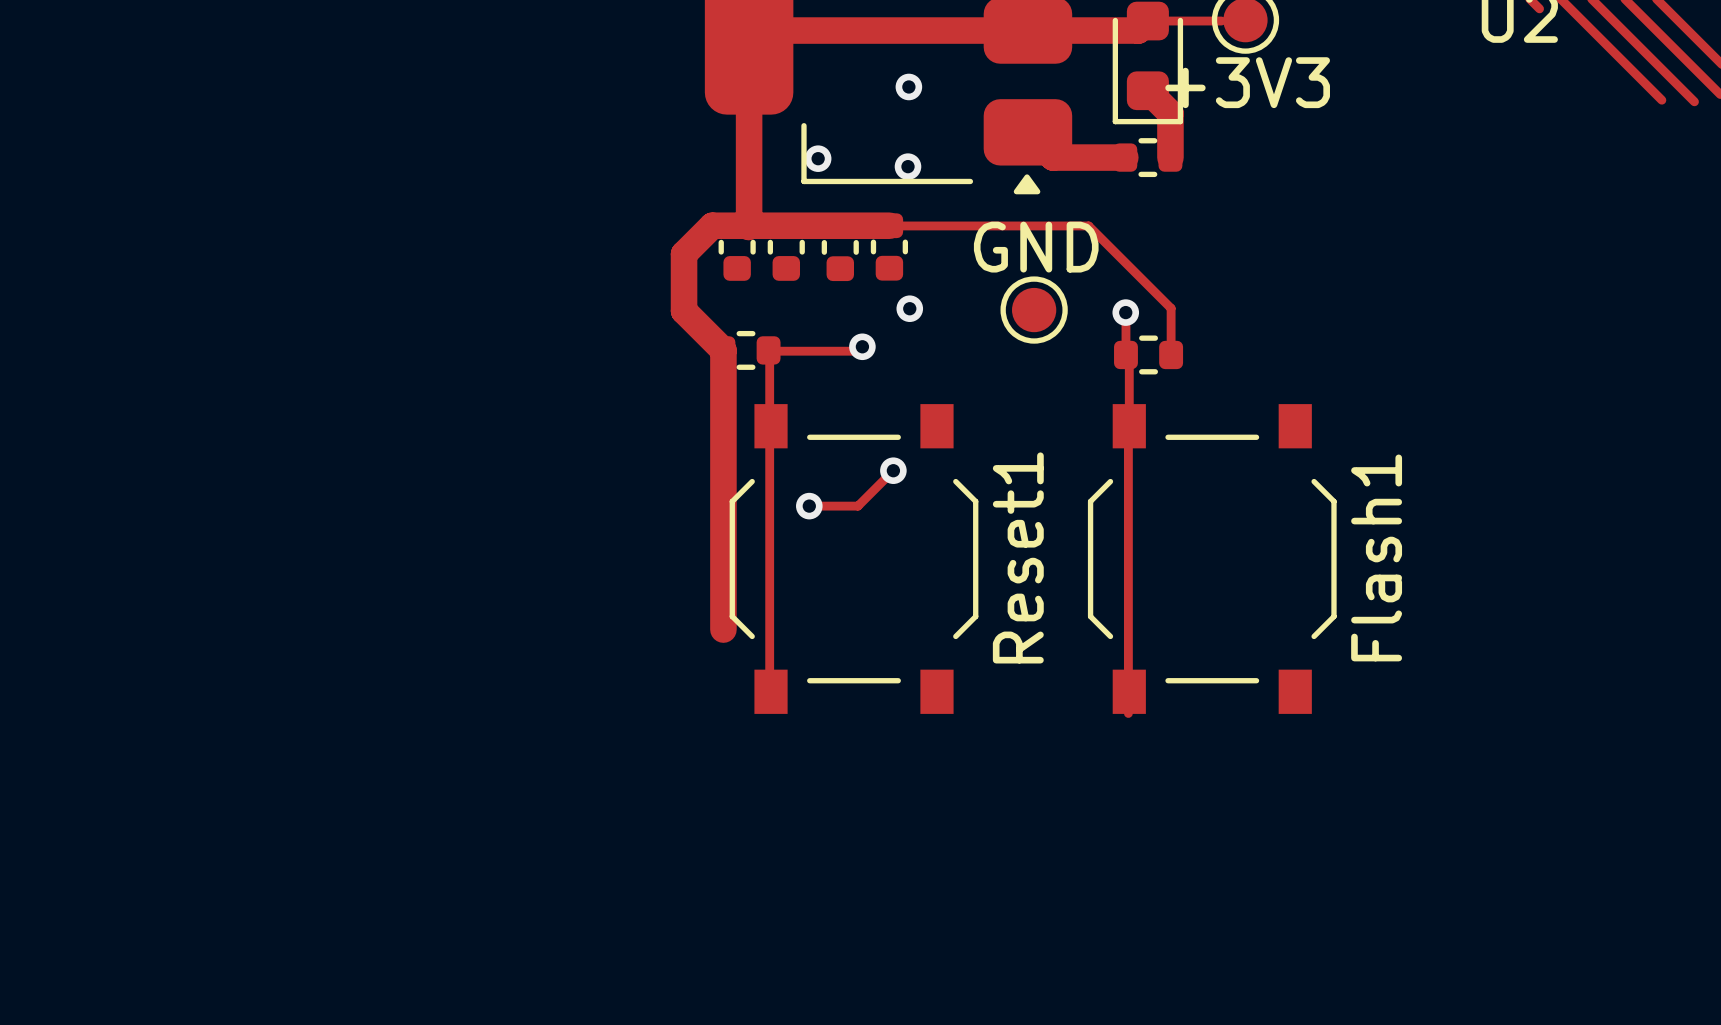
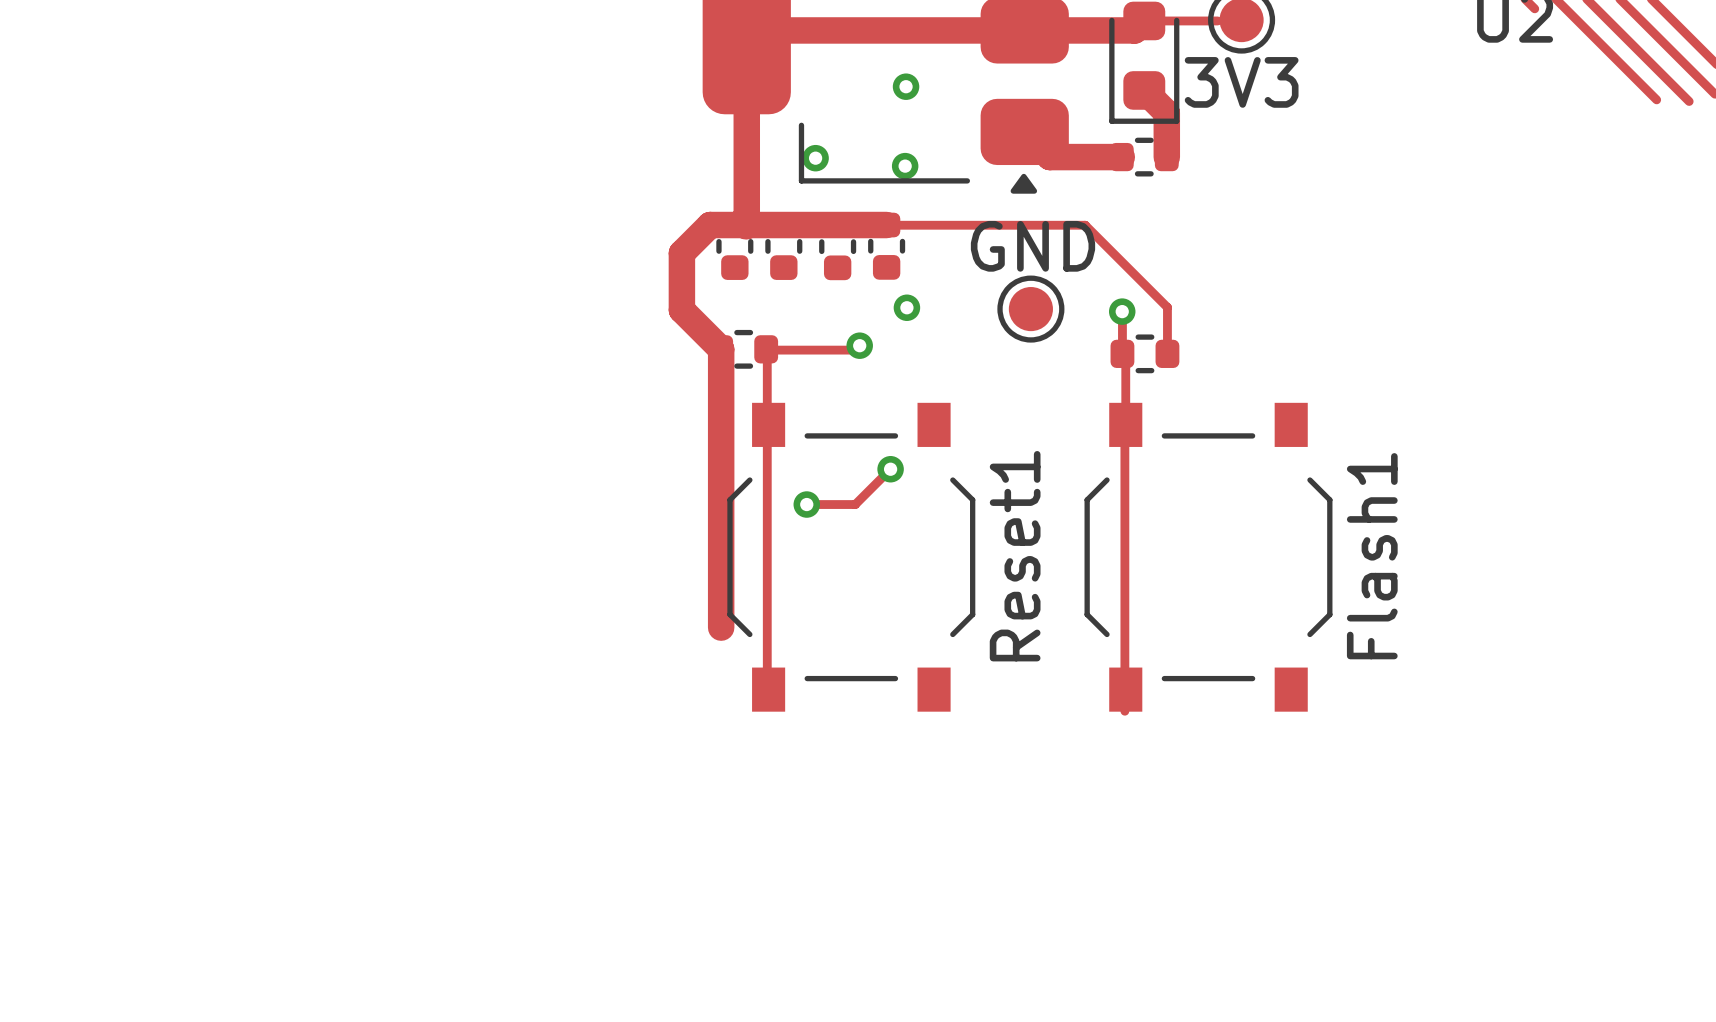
+3V3 name: +3V3 (1247, 82) -> 3V3 (1241, 82)

